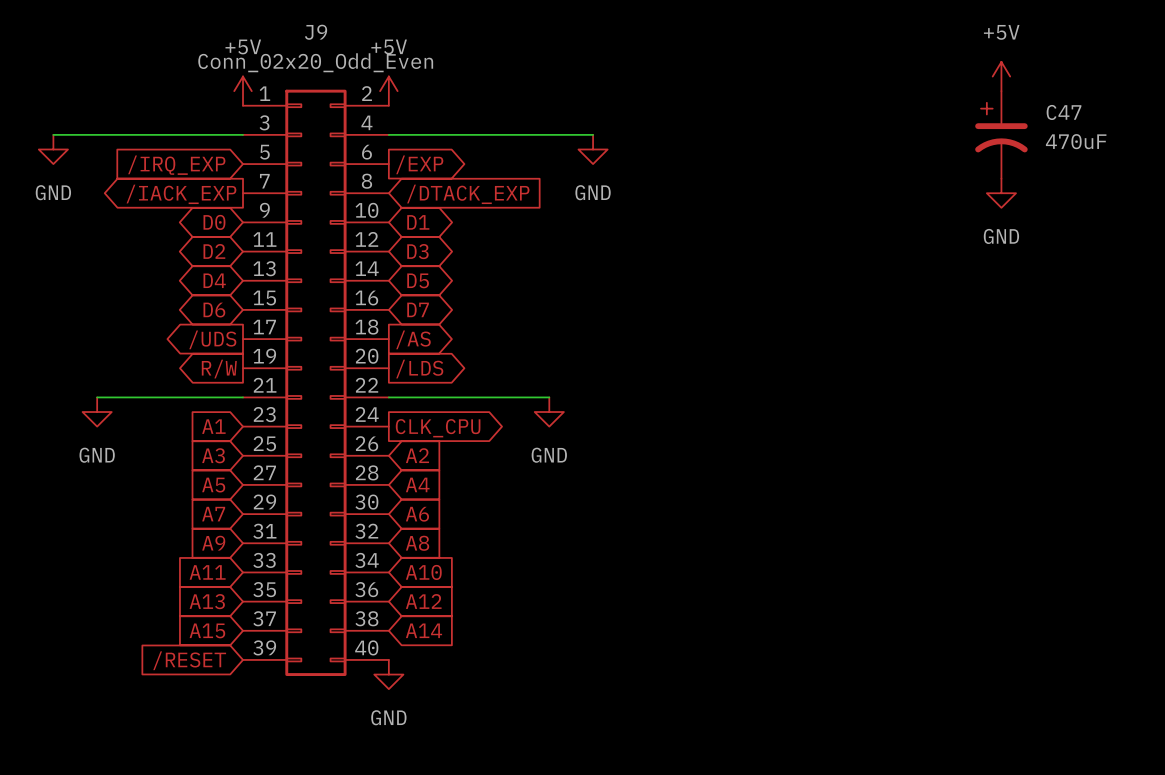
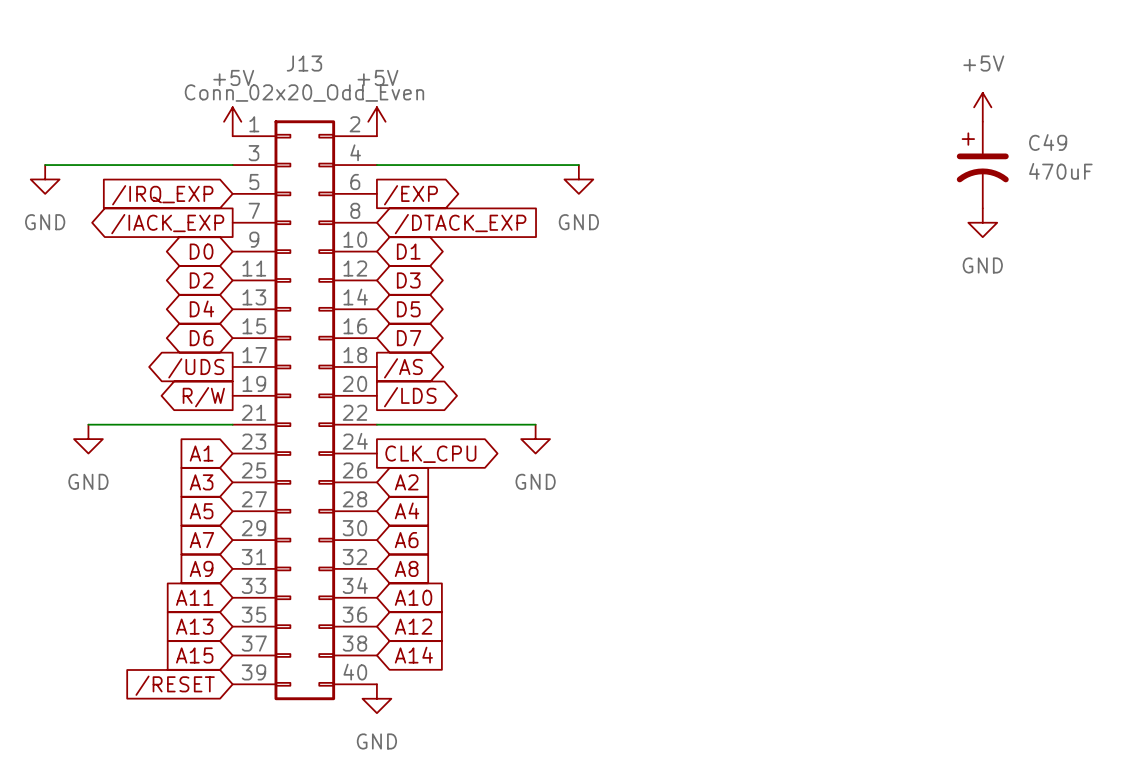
J9 name: J9 (316, 32) -> J13 (304, 63)
C47 name: C47 (1064, 112) -> C49 (1048, 142)

